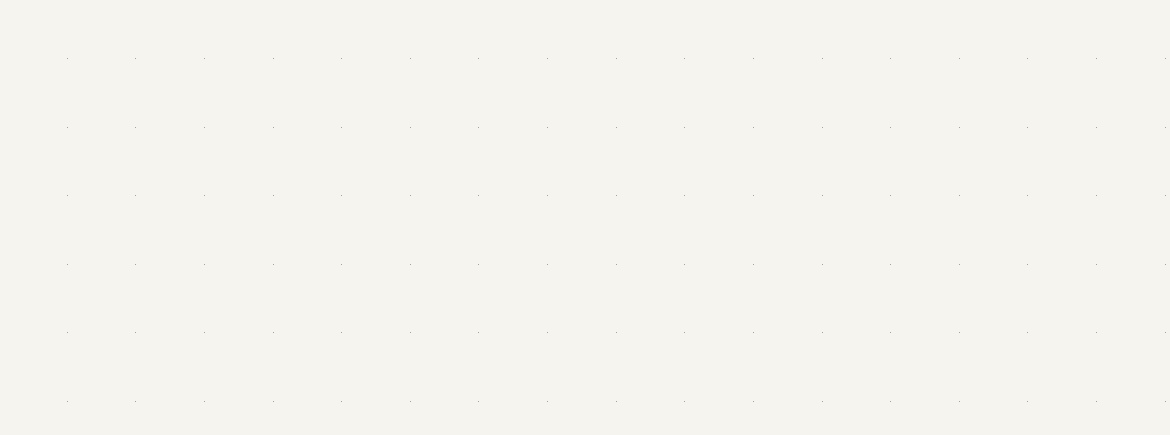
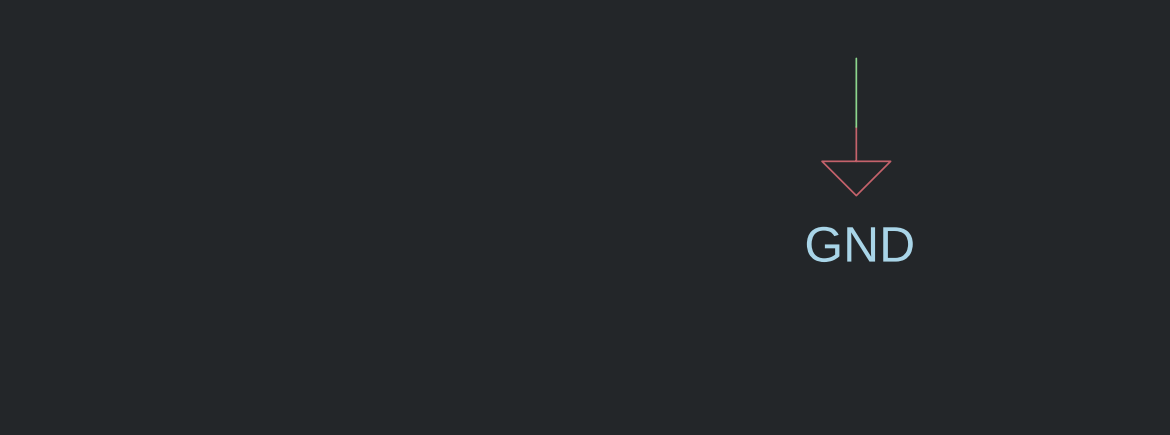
wire: none -> (856, 58) (856, 127)
power symbol: none -> GND (856, 161)

